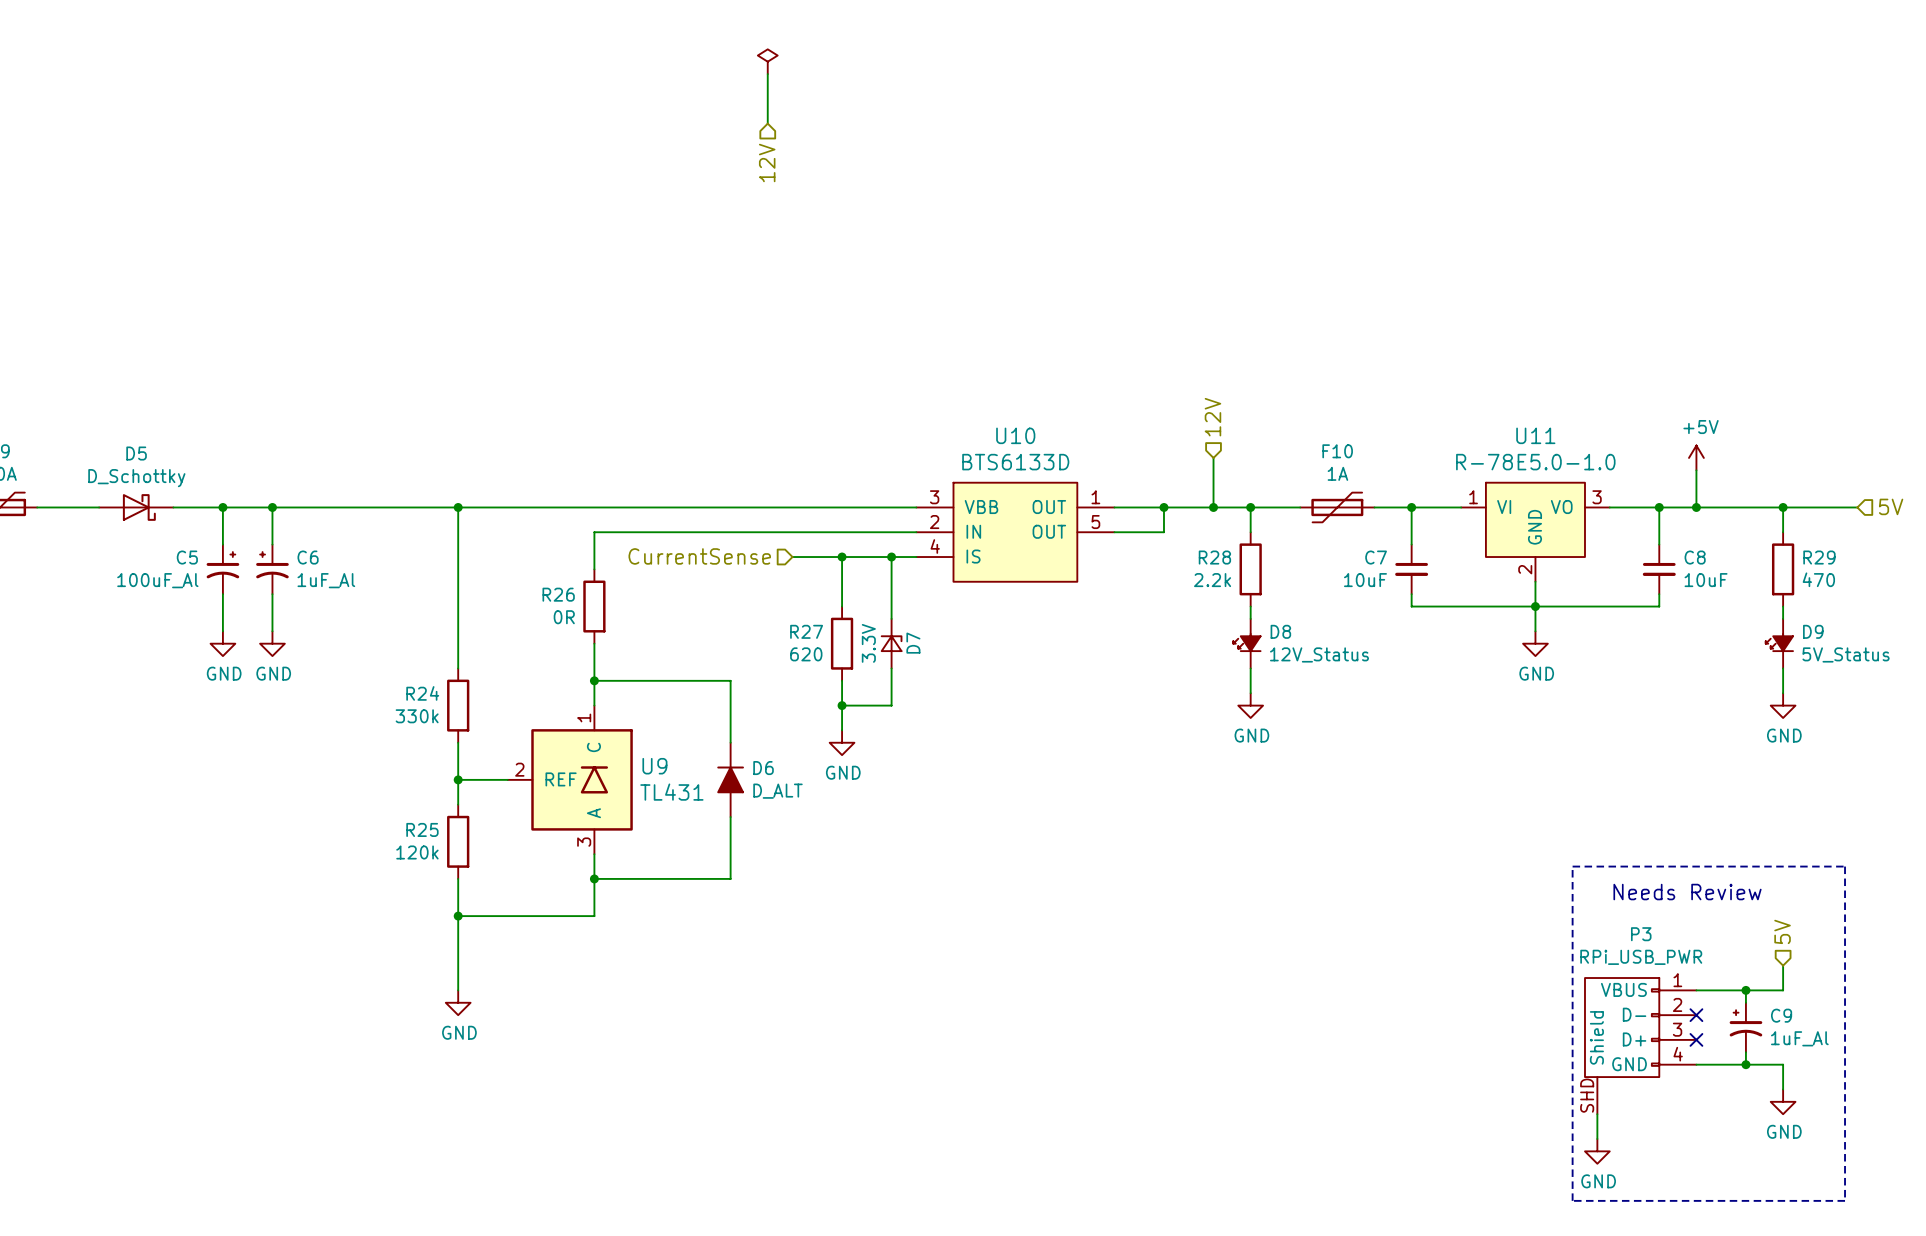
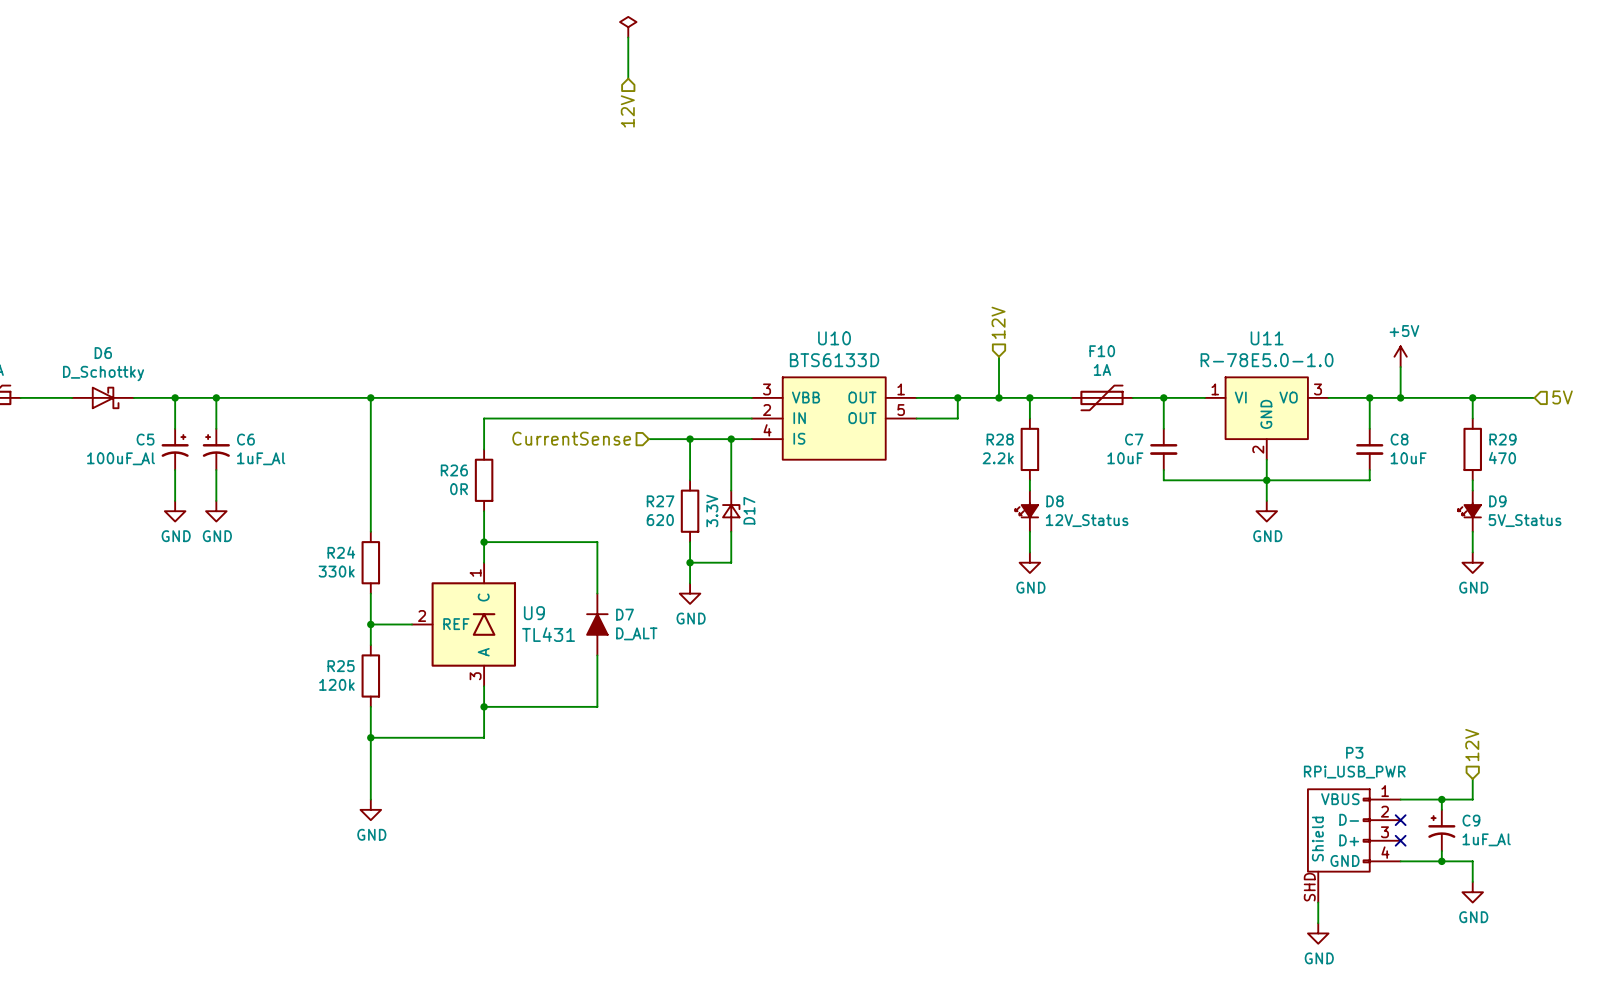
D5 name: D5 (136, 453) -> D6 (103, 353)
D7 name: D7 (913, 643) -> D17 (749, 510)
D6 name: D6 (763, 768) -> D7 (625, 614)
line: (1572, 866) (1845, 866) (1845, 1200) (1572, 1200) (1572, 866) -> none
text: Needs Review (1687, 892) -> none
hierarchical label: 5V (1782, 931) -> 12V (1472, 745)

